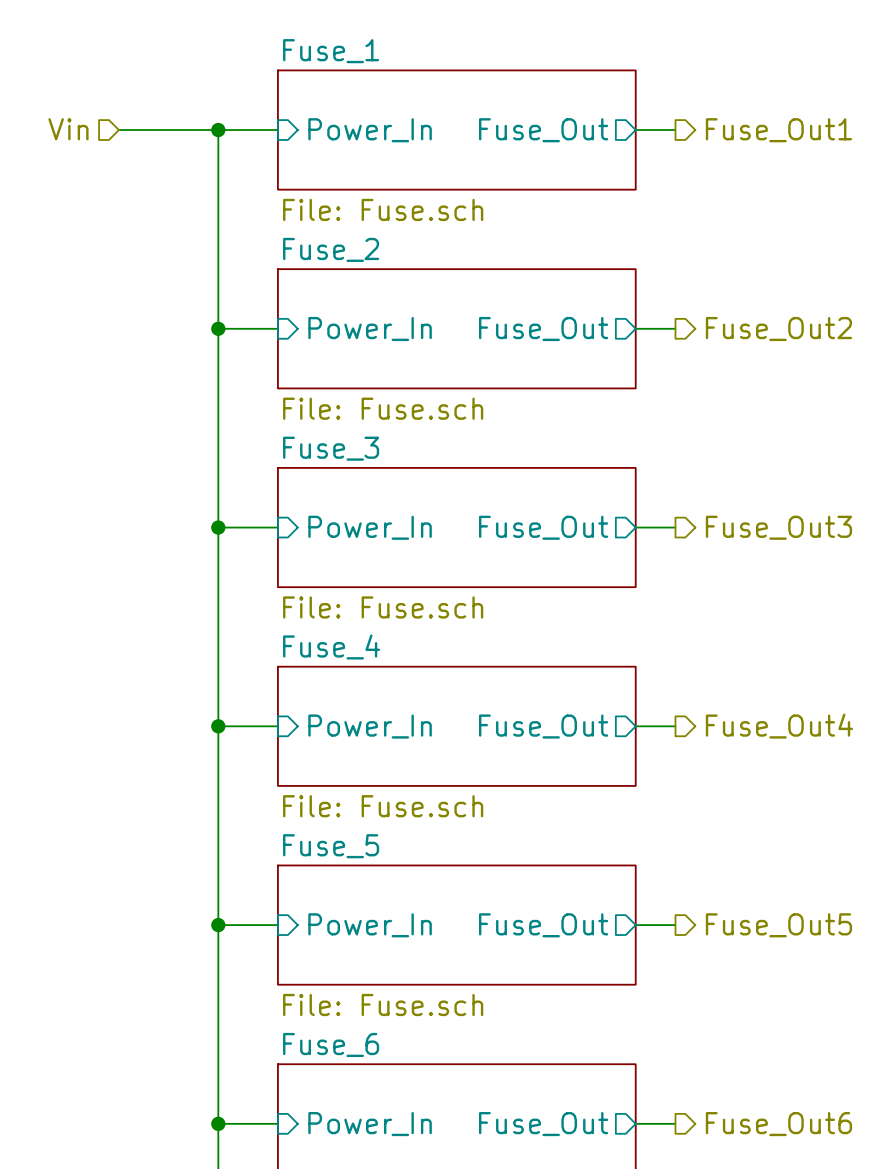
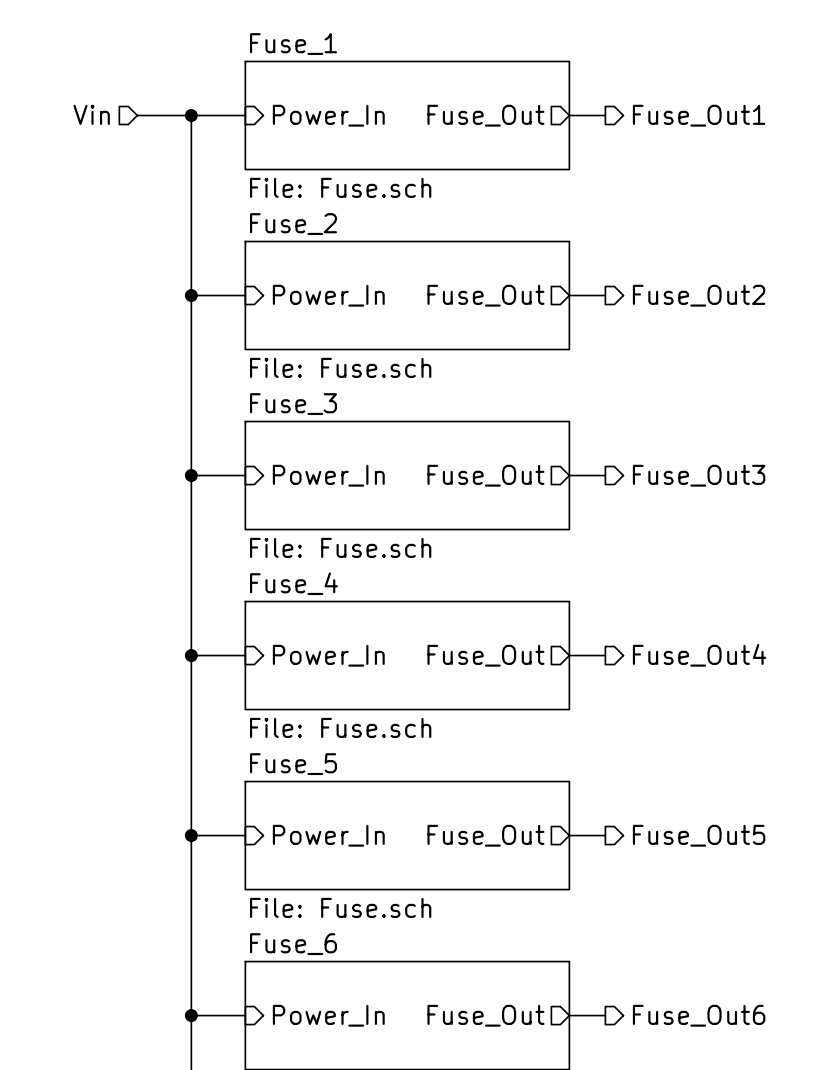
hierarchical label position: Vin (68, 129) -> Vin (91, 114)
wire: (118, 130) (158, 130) -> none

